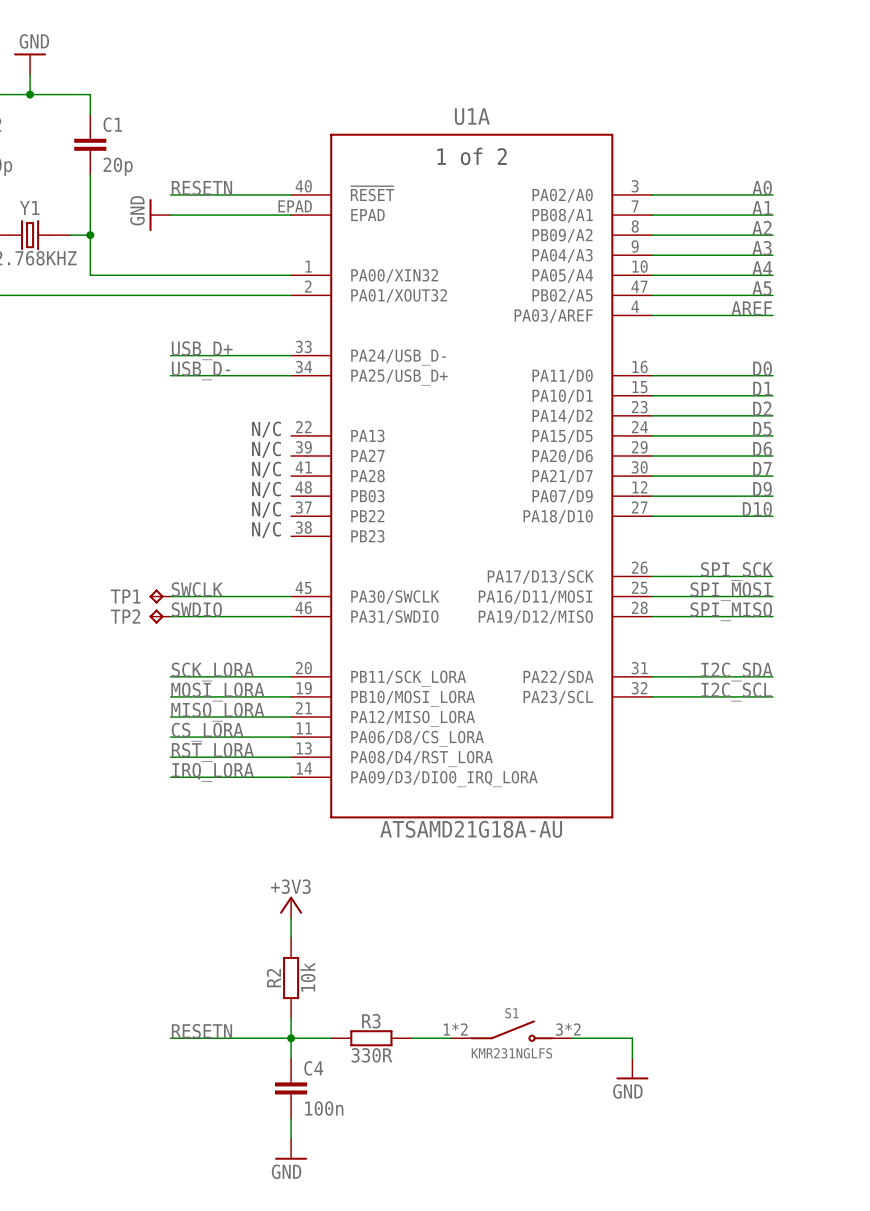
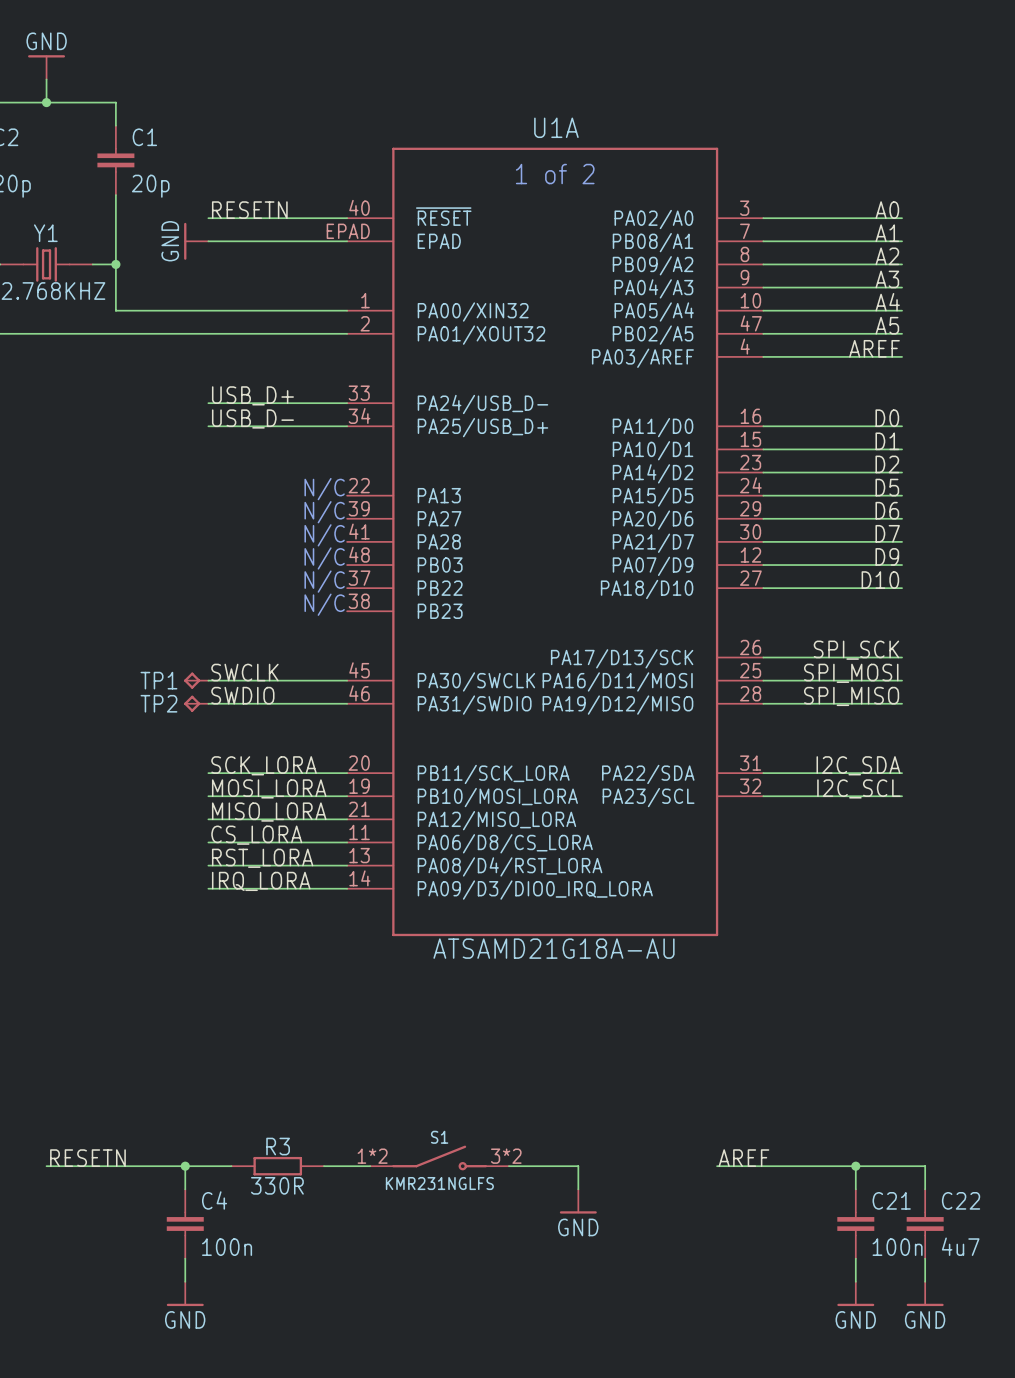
power symbol: +3V3 (291, 907) -> none
wire: (291, 917) (291, 937) -> (185, 1166) (185, 1189)
R2: 10k (291, 978) -> none
label: none -> AREF (743, 1158)
junction: none -> (185, 1166)
wire: (291, 1018) (291, 1058) -> none
wire: none -> (717, 1166) (925, 1166) (925, 1189)
wire: none -> (855, 1166) (855, 1189)
junction: none -> (855, 1166)
label position: RESETN (201, 1031) -> RESETN (87, 1158)
S1 position: (511, 1031) -> (439, 1157)
wire: (170, 1038) (331, 1038) -> (46, 1166) (231, 1166)
junction: (291, 1038) -> none
R3 position: (371, 1038) -> (277, 1166)
wire: (411, 1038) (451, 1038) -> (324, 1166) (370, 1166)
wire: (572, 1038) (632, 1038) (632, 1058) -> (508, 1166) (578, 1166) (578, 1189)
power symbol: none -> GND (578, 1201)
power symbol: GND (632, 1068) -> none
C21: none -> 100n (855, 1223)
C22: none -> 4u7 (925, 1223)
C4 position: (291, 1088) -> (185, 1223)
wire: none -> (855, 1258) (855, 1281)
wire: none -> (925, 1258) (925, 1281)
wire: (291, 1118) (291, 1138) -> (185, 1258) (185, 1281)
power symbol: none -> GND (185, 1293)
power symbol: none -> GND (855, 1293)
power symbol: none -> GND (925, 1293)
power symbol: GND (291, 1149) -> none

